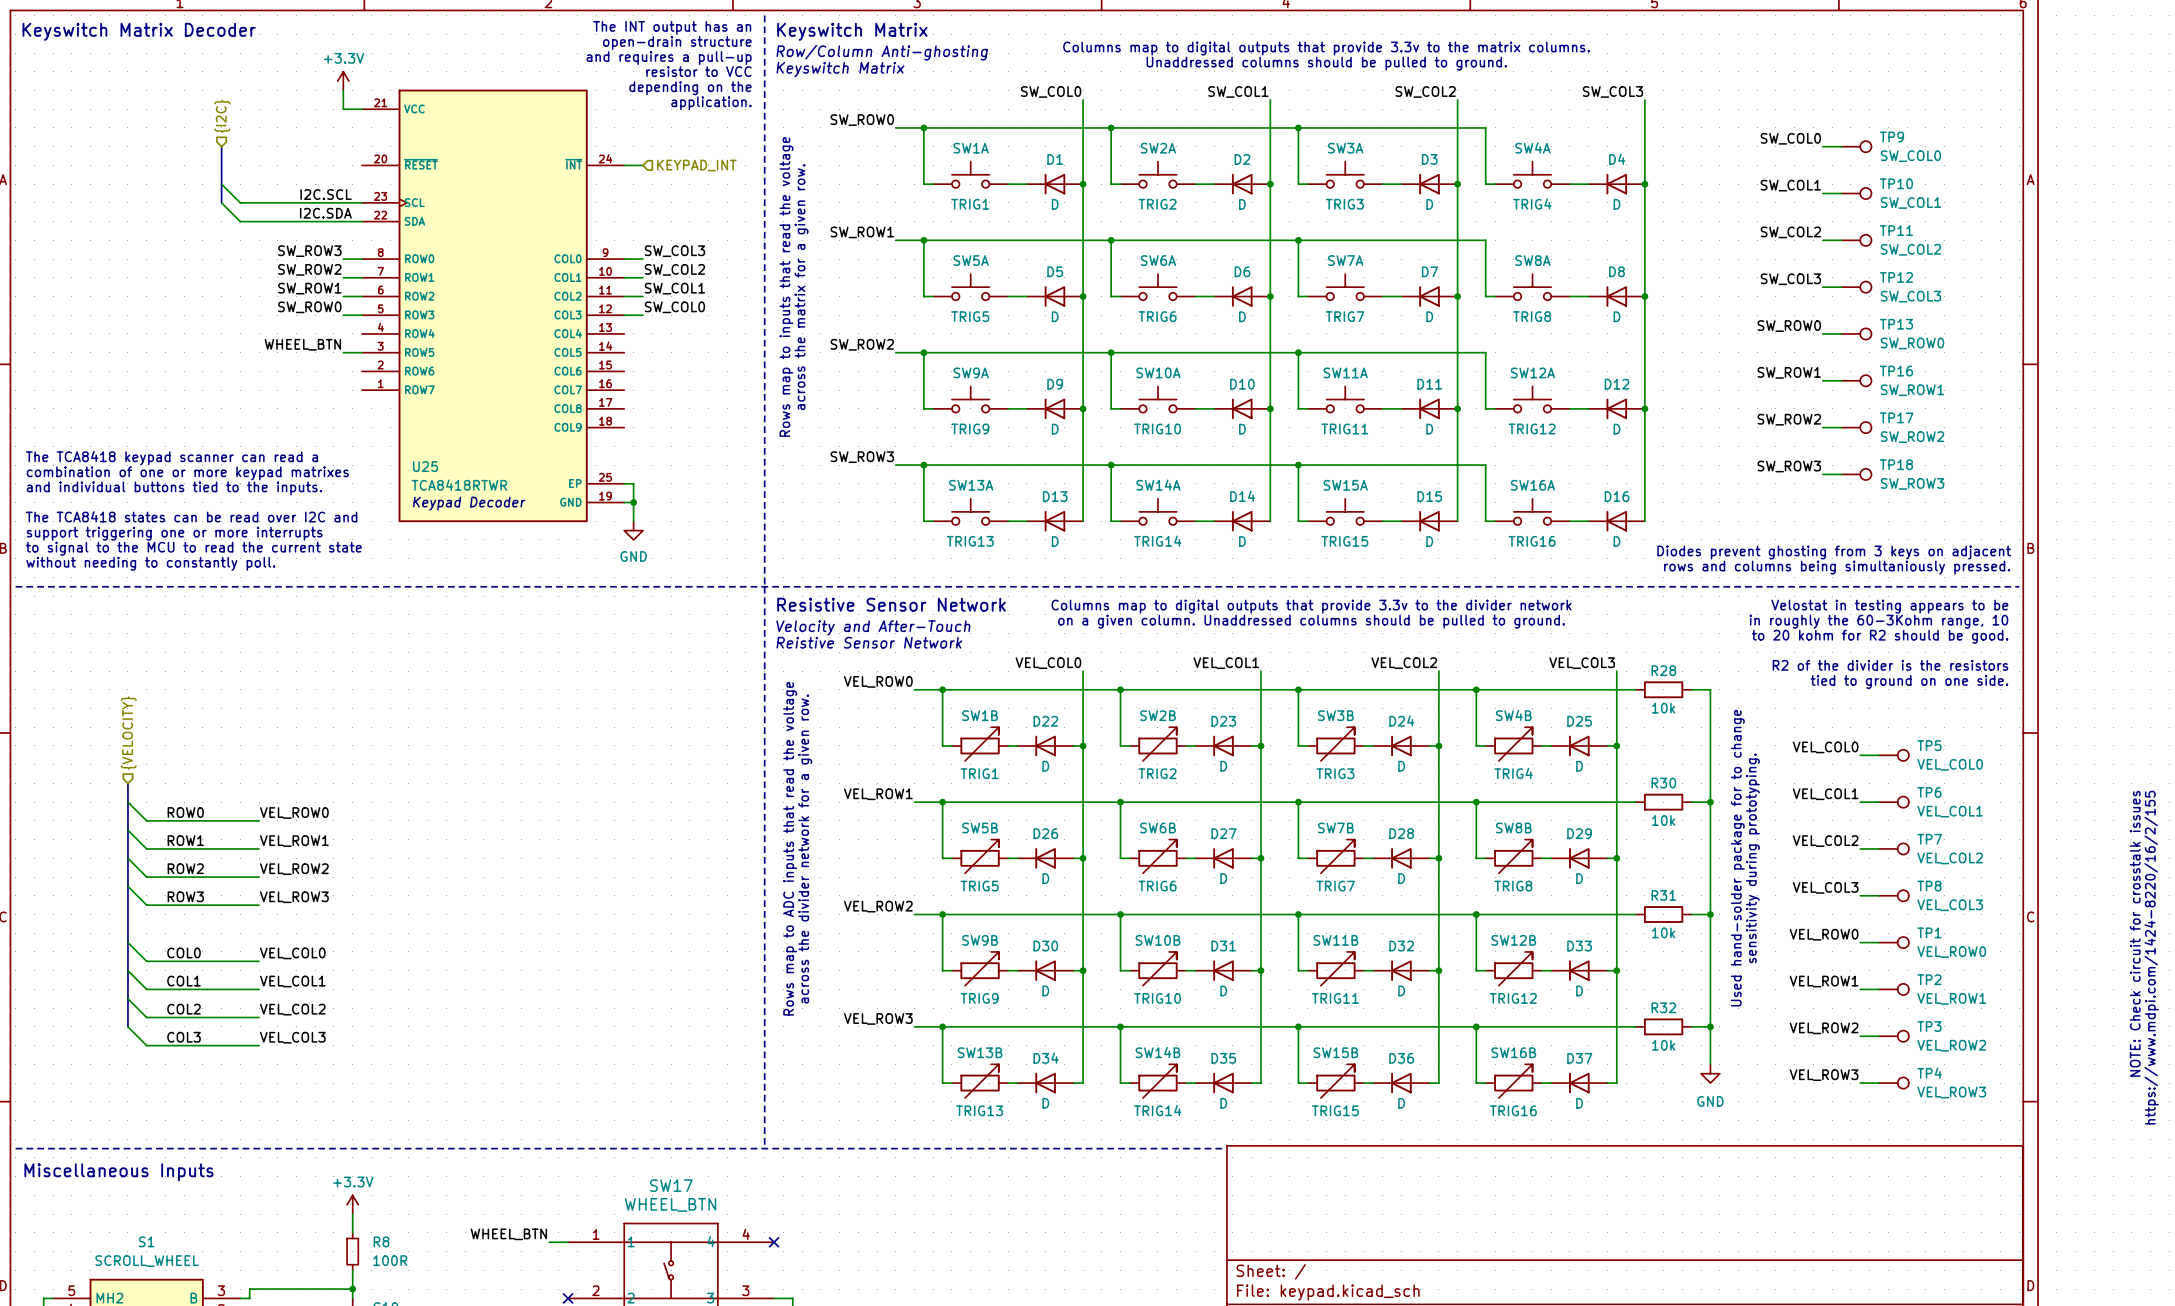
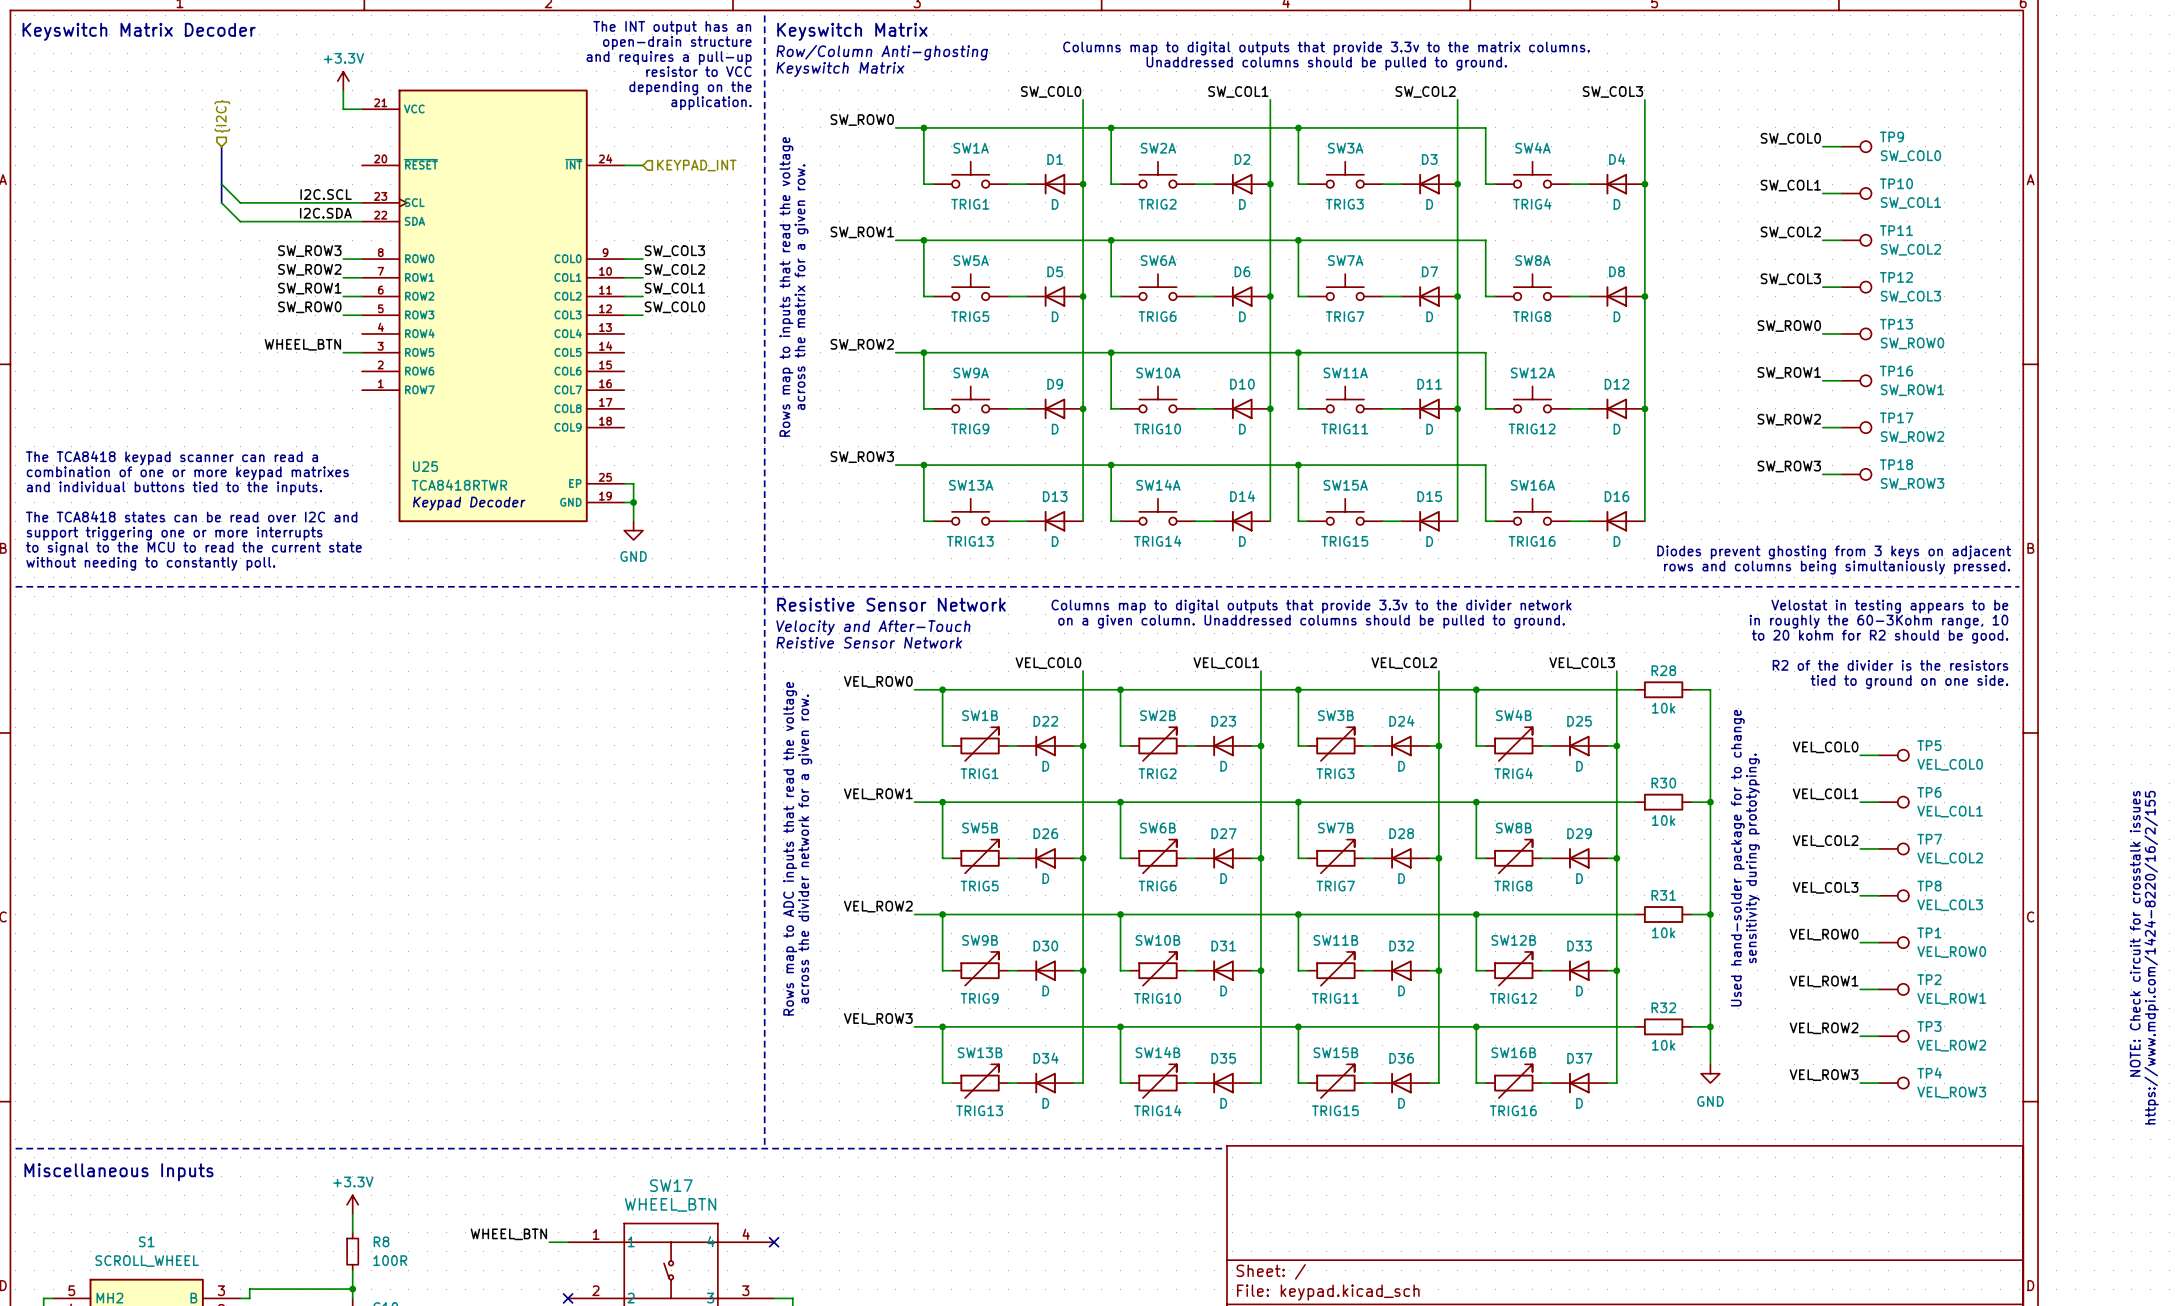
hierarchical label: {VELOCITY} (128, 733) -> none
bus: (127, 783) (127, 1026) -> none
wire: (127, 802) (146, 820) (259, 820) -> none
label: ROW0 (185, 812) -> none
label: VEL_ROW0 (294, 812) -> none
wire: (127, 830) (146, 848) (259, 848) -> none
label: ROW1 (185, 840) -> none
label: VEL_ROW1 (294, 841) -> none
wire: (127, 858) (146, 877) (259, 877) -> none
label: ROW2 (185, 868) -> none
label: VEL_ROW2 (294, 869) -> none
wire: (127, 886) (146, 905) (259, 905) -> none
label: ROW3 (185, 896) -> none
label: VEL_ROW3 (294, 897) -> none
wire: (127, 942) (146, 961) (259, 961) -> none
label: COL0 (184, 952) -> none
label: VEL_COL0 (292, 953) -> none
wire: (127, 970) (146, 989) (259, 989) -> none
label: COL1 (184, 981) -> none
label: VEL_COL1 (292, 981) -> none
wire: (127, 998) (146, 1017) (259, 1017) -> none
label: COL2 (184, 1009) -> none
label: VEL_COL2 (292, 1009) -> none
wire: (127, 1026) (146, 1045) (259, 1045) -> none
label: COL3 (184, 1037) -> none
label: VEL_COL3 (292, 1037) -> none

